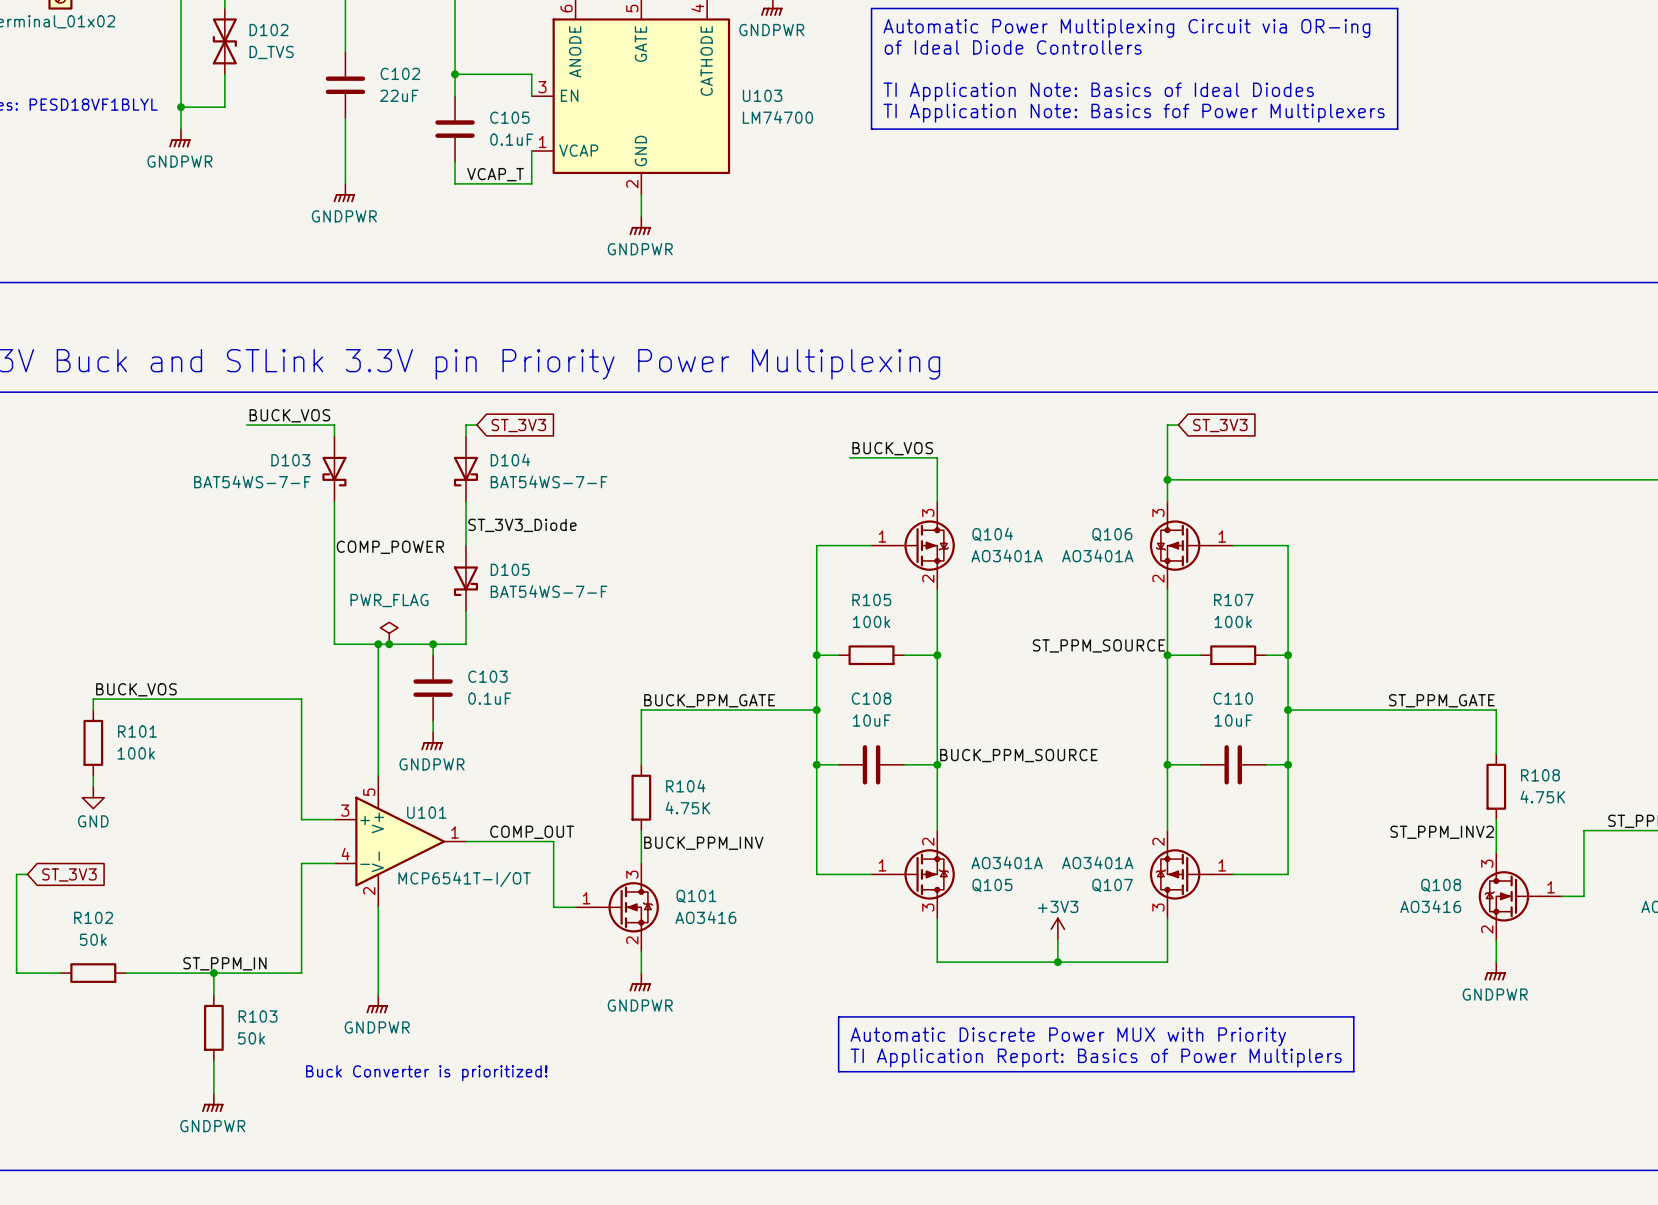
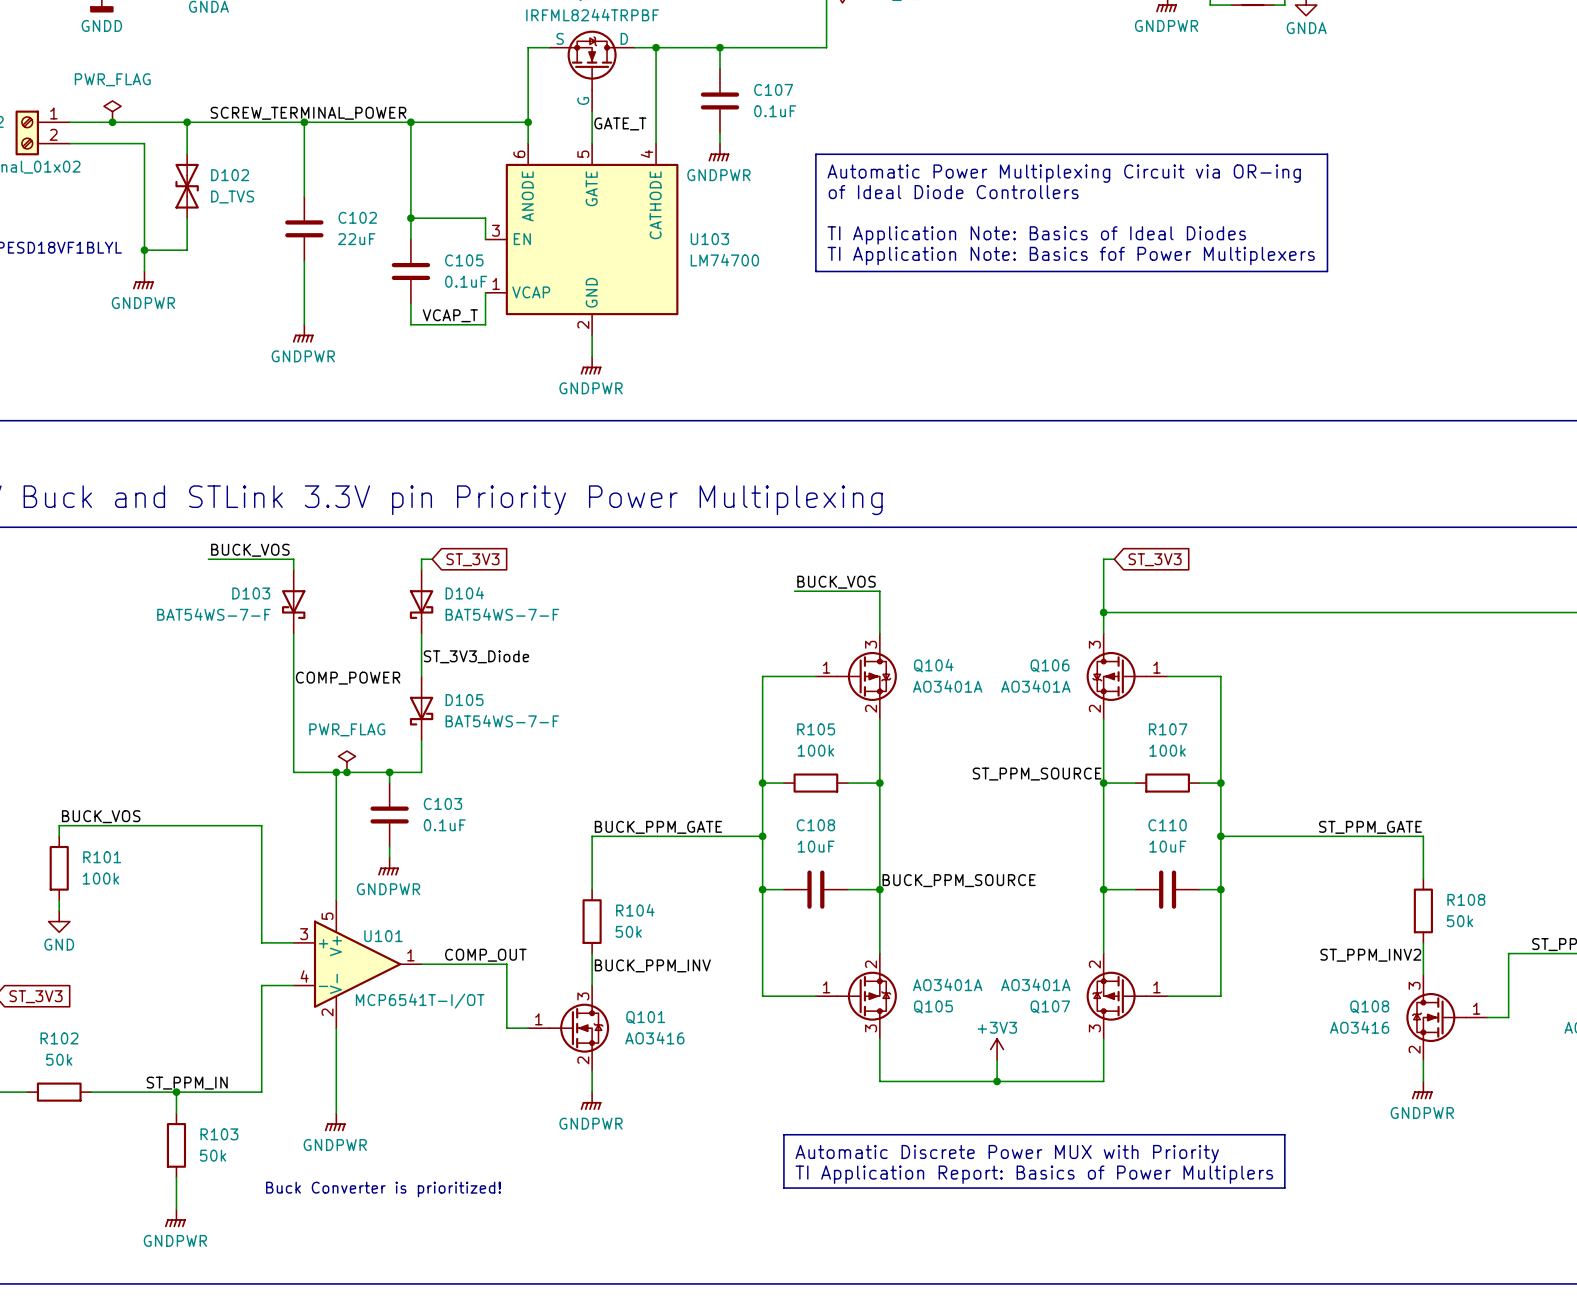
R108 value: 4.75K (1542, 797) -> 50k (1460, 921)
R104 value: 4.75K (687, 807) -> 50k (628, 931)

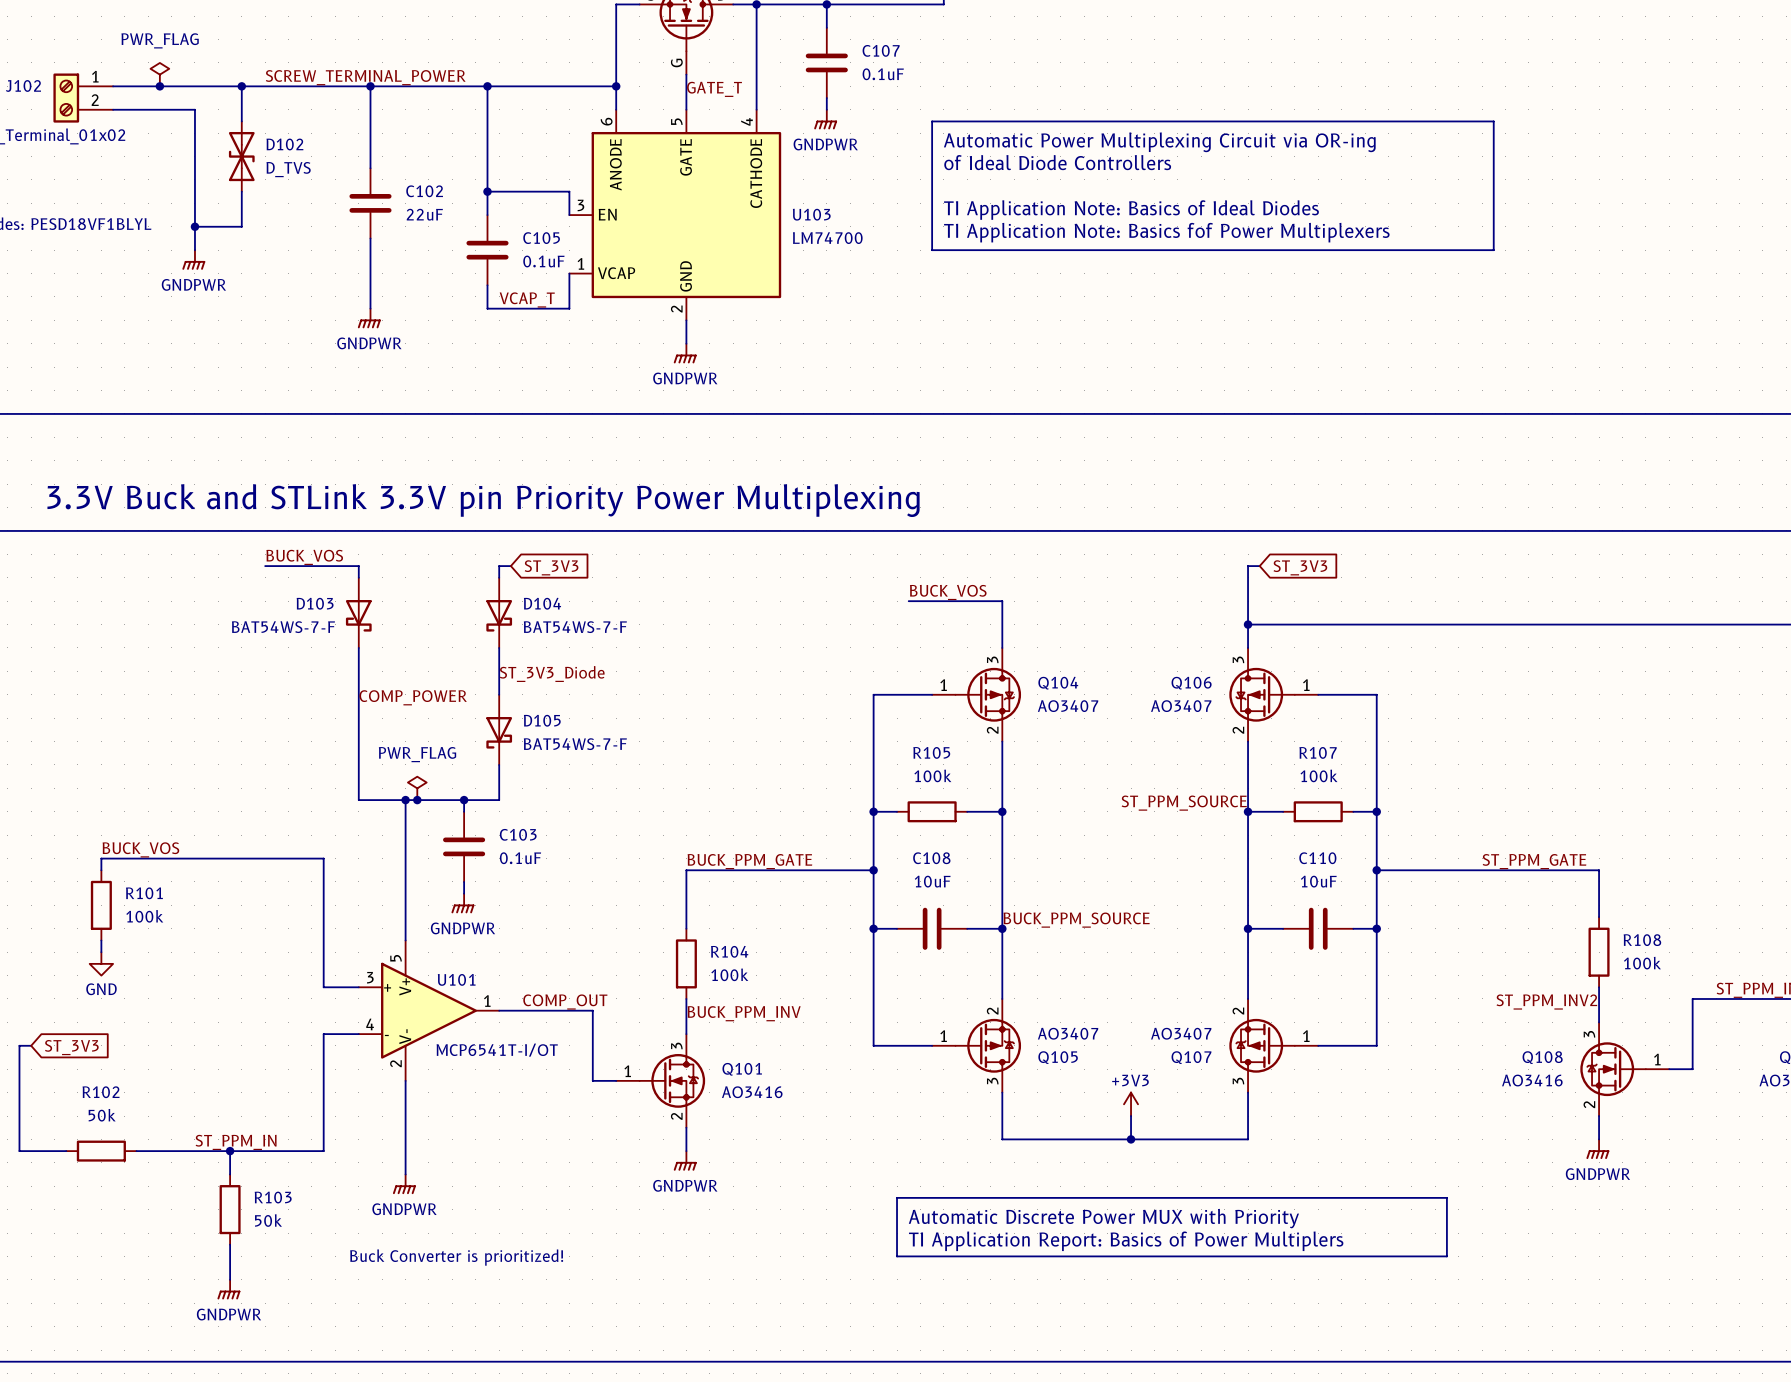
Q104 value: AO3401A (947, 686) -> AO3407 (1068, 706)
Q106 value: AO3401A (1035, 686) -> AO3407 (1181, 706)
R108 value: 50k (1460, 921) -> 100k (1642, 963)
R104 value: 50k (628, 931) -> 100k (729, 974)
Q105 value: AO3401A (947, 984) -> AO3407 (1068, 1033)
Q107 value: AO3401A (1035, 984) -> AO3407 (1181, 1033)

